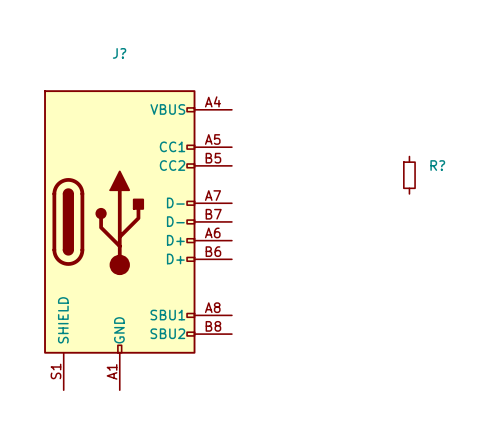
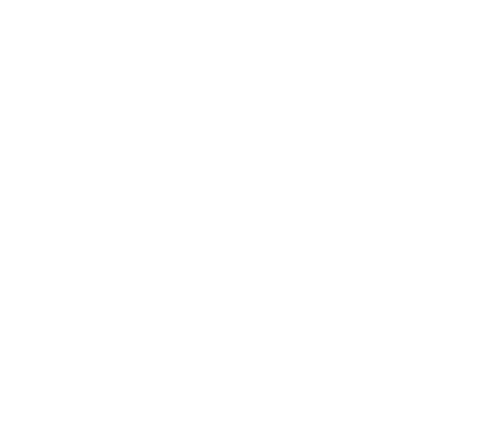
R?: (409, 175) -> none
J?: (137, 240) -> none

